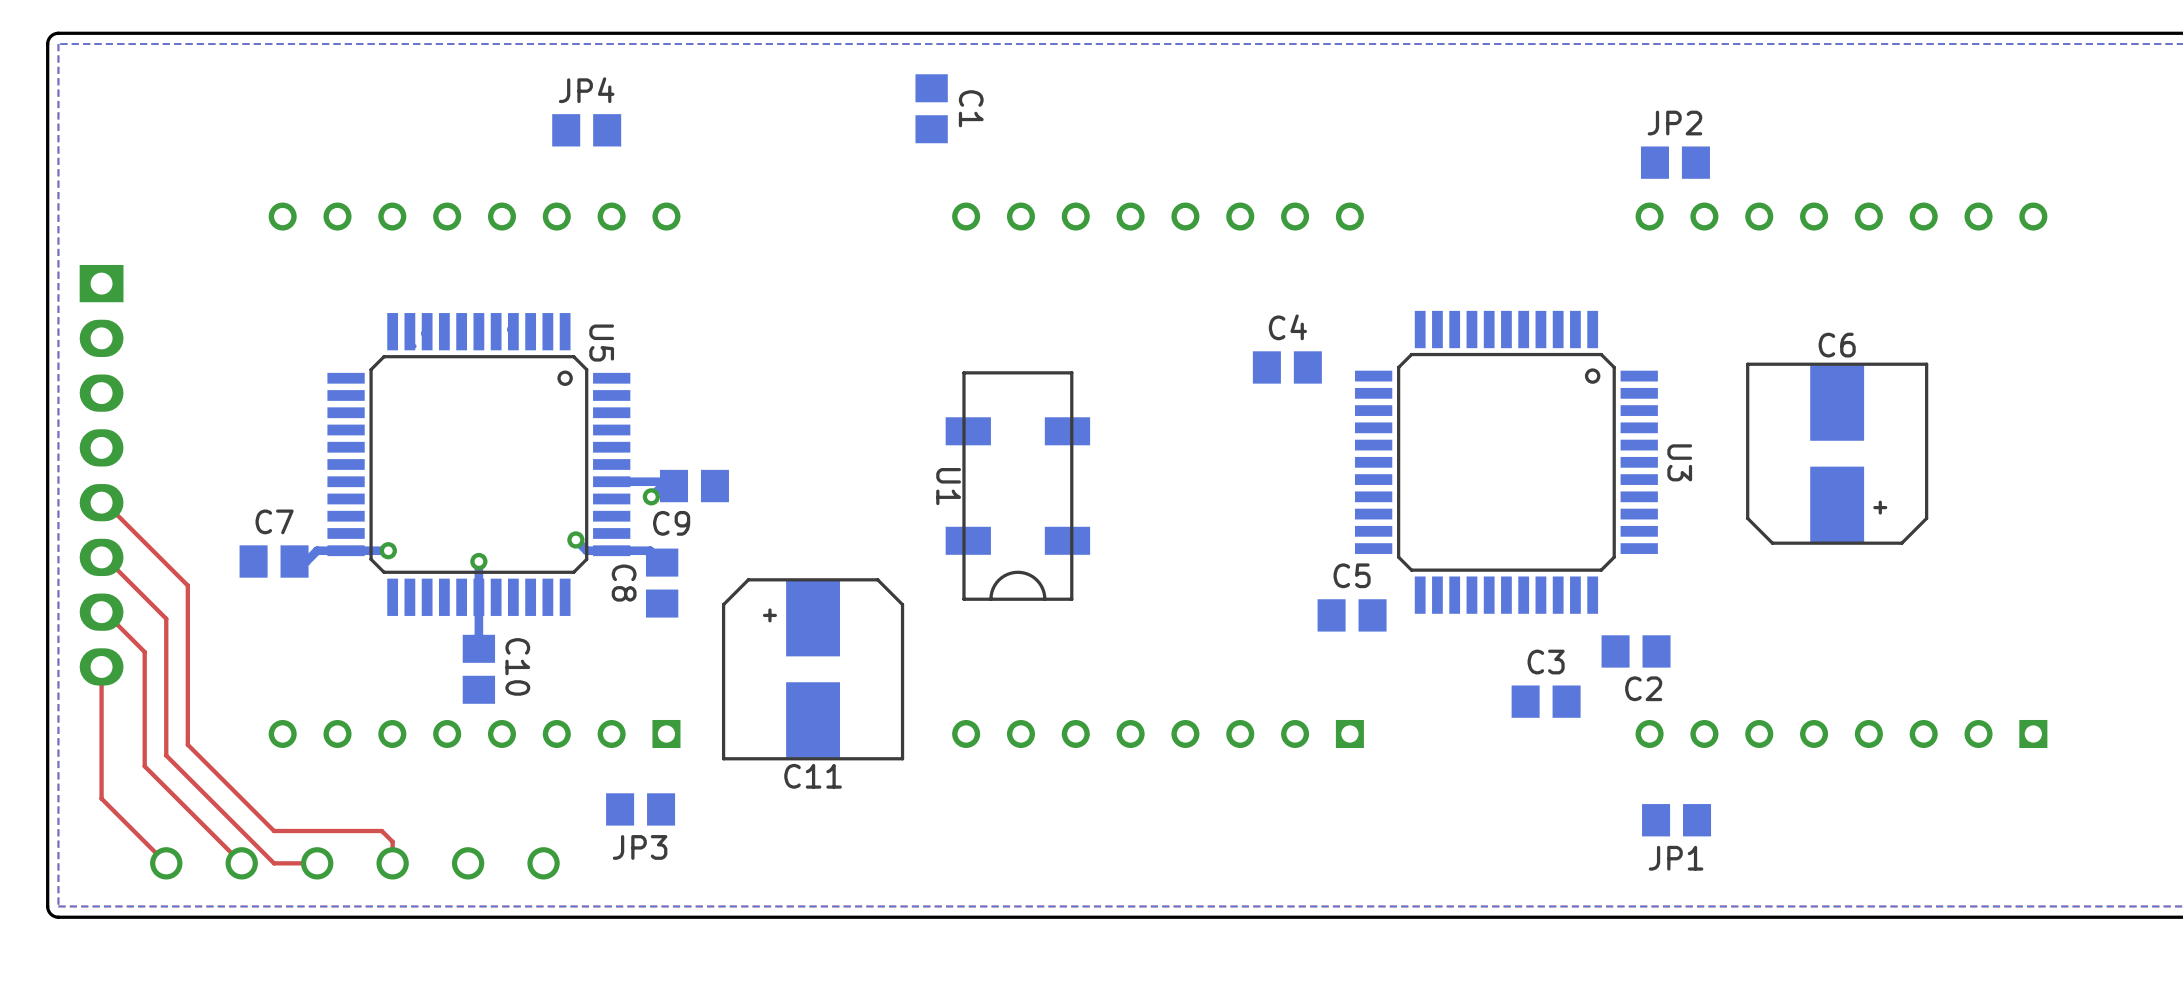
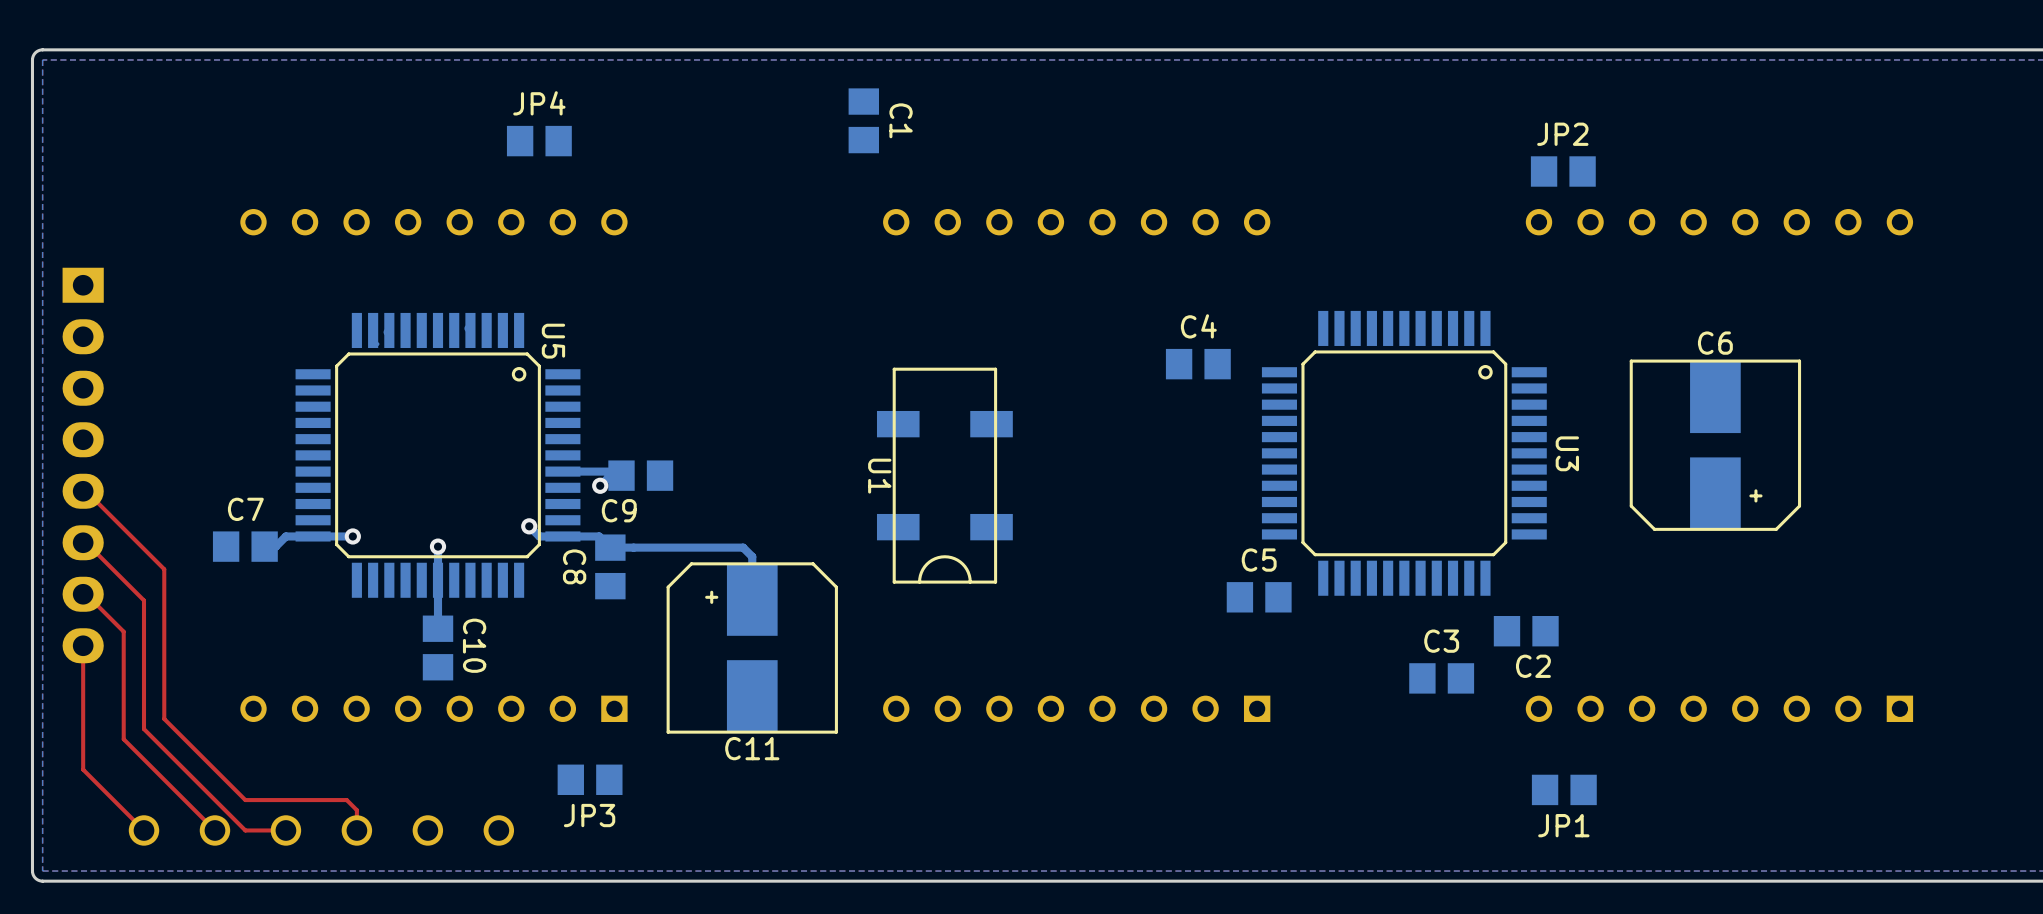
bottom track: none -> (610, 547) (743, 547) (752, 556) (752, 588)

